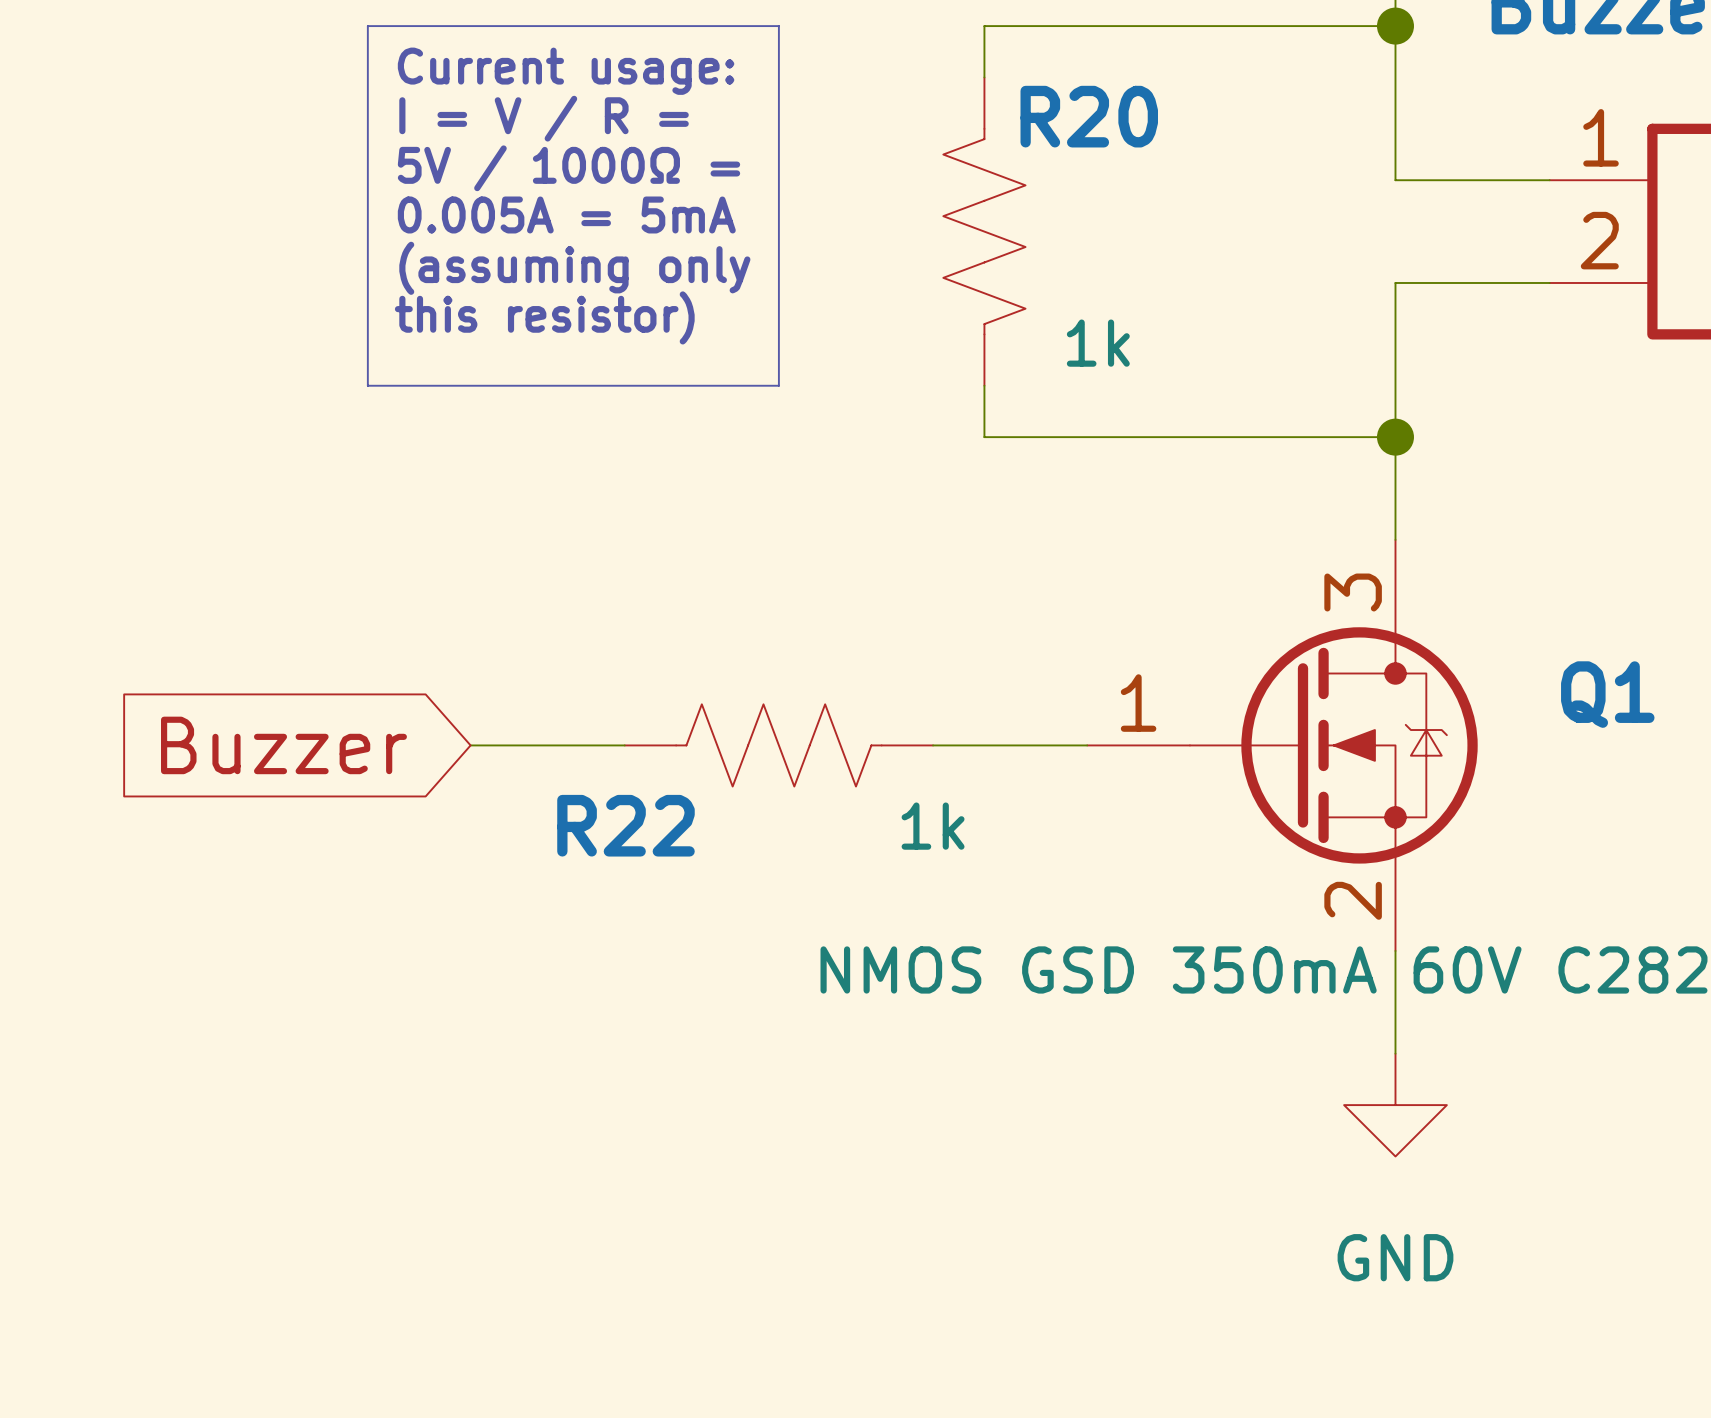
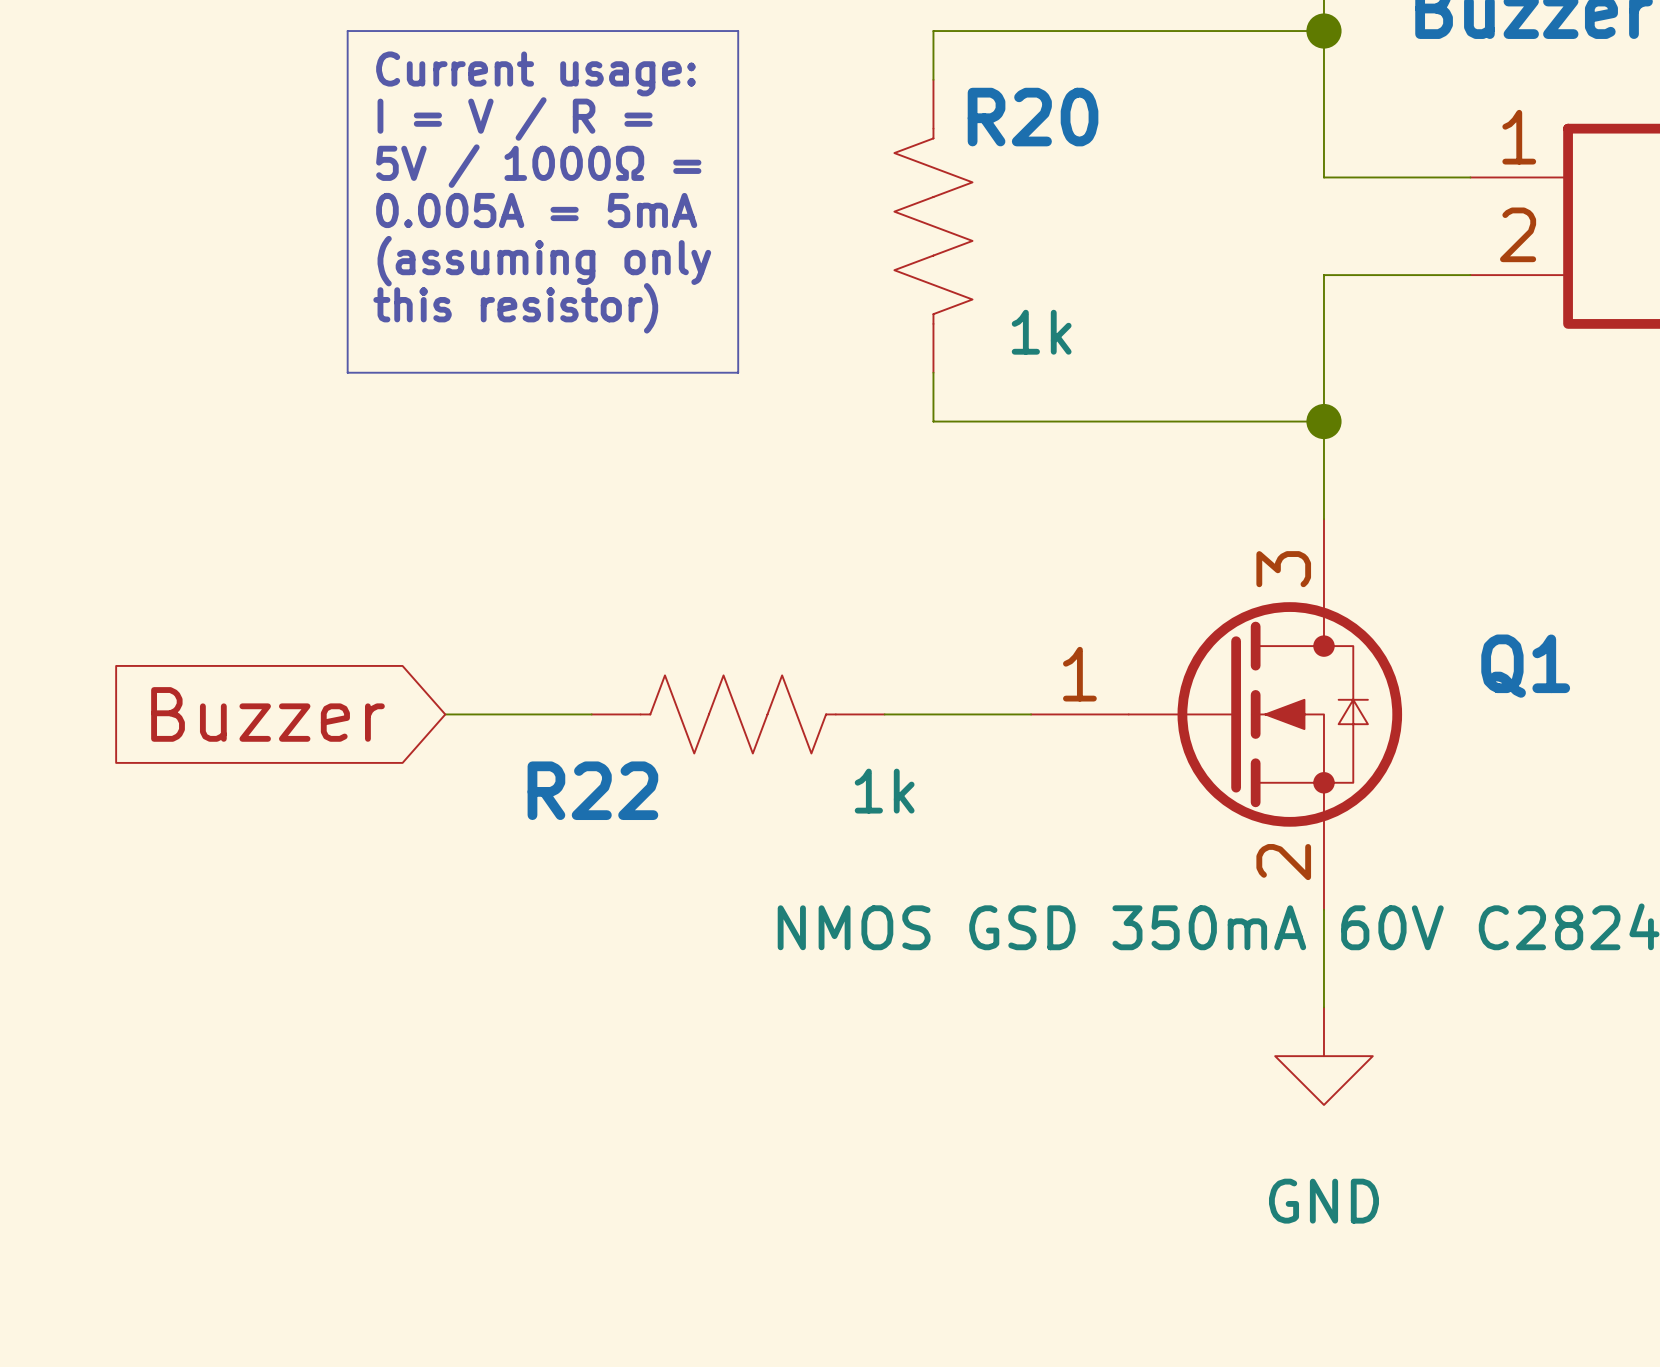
Q1 symbol: [1087, 539, 1478, 951] -> [1031, 519, 1403, 910]

